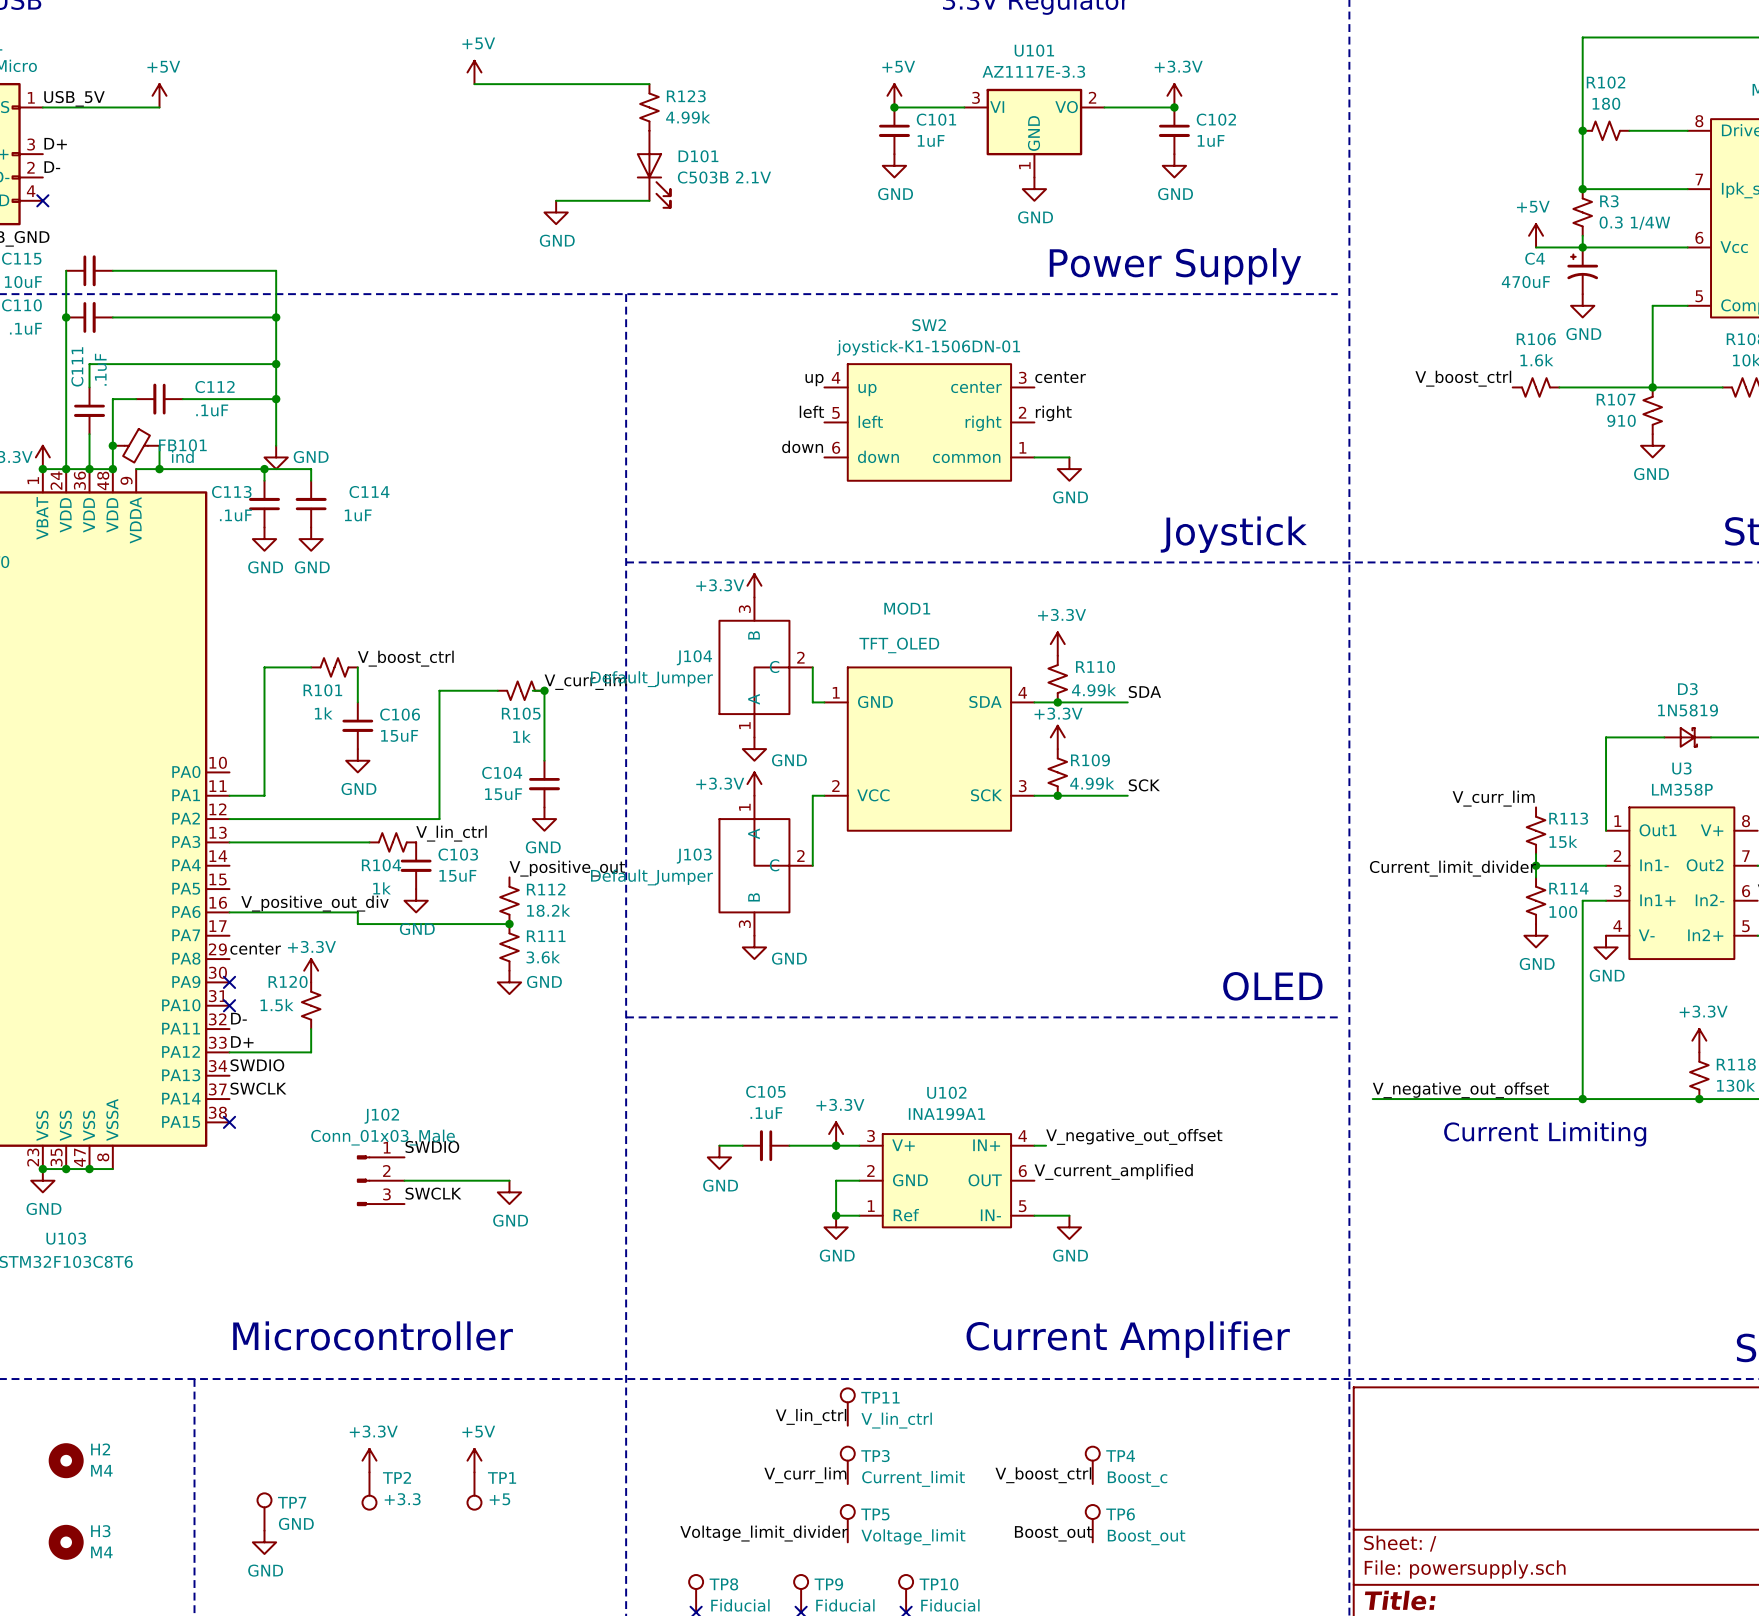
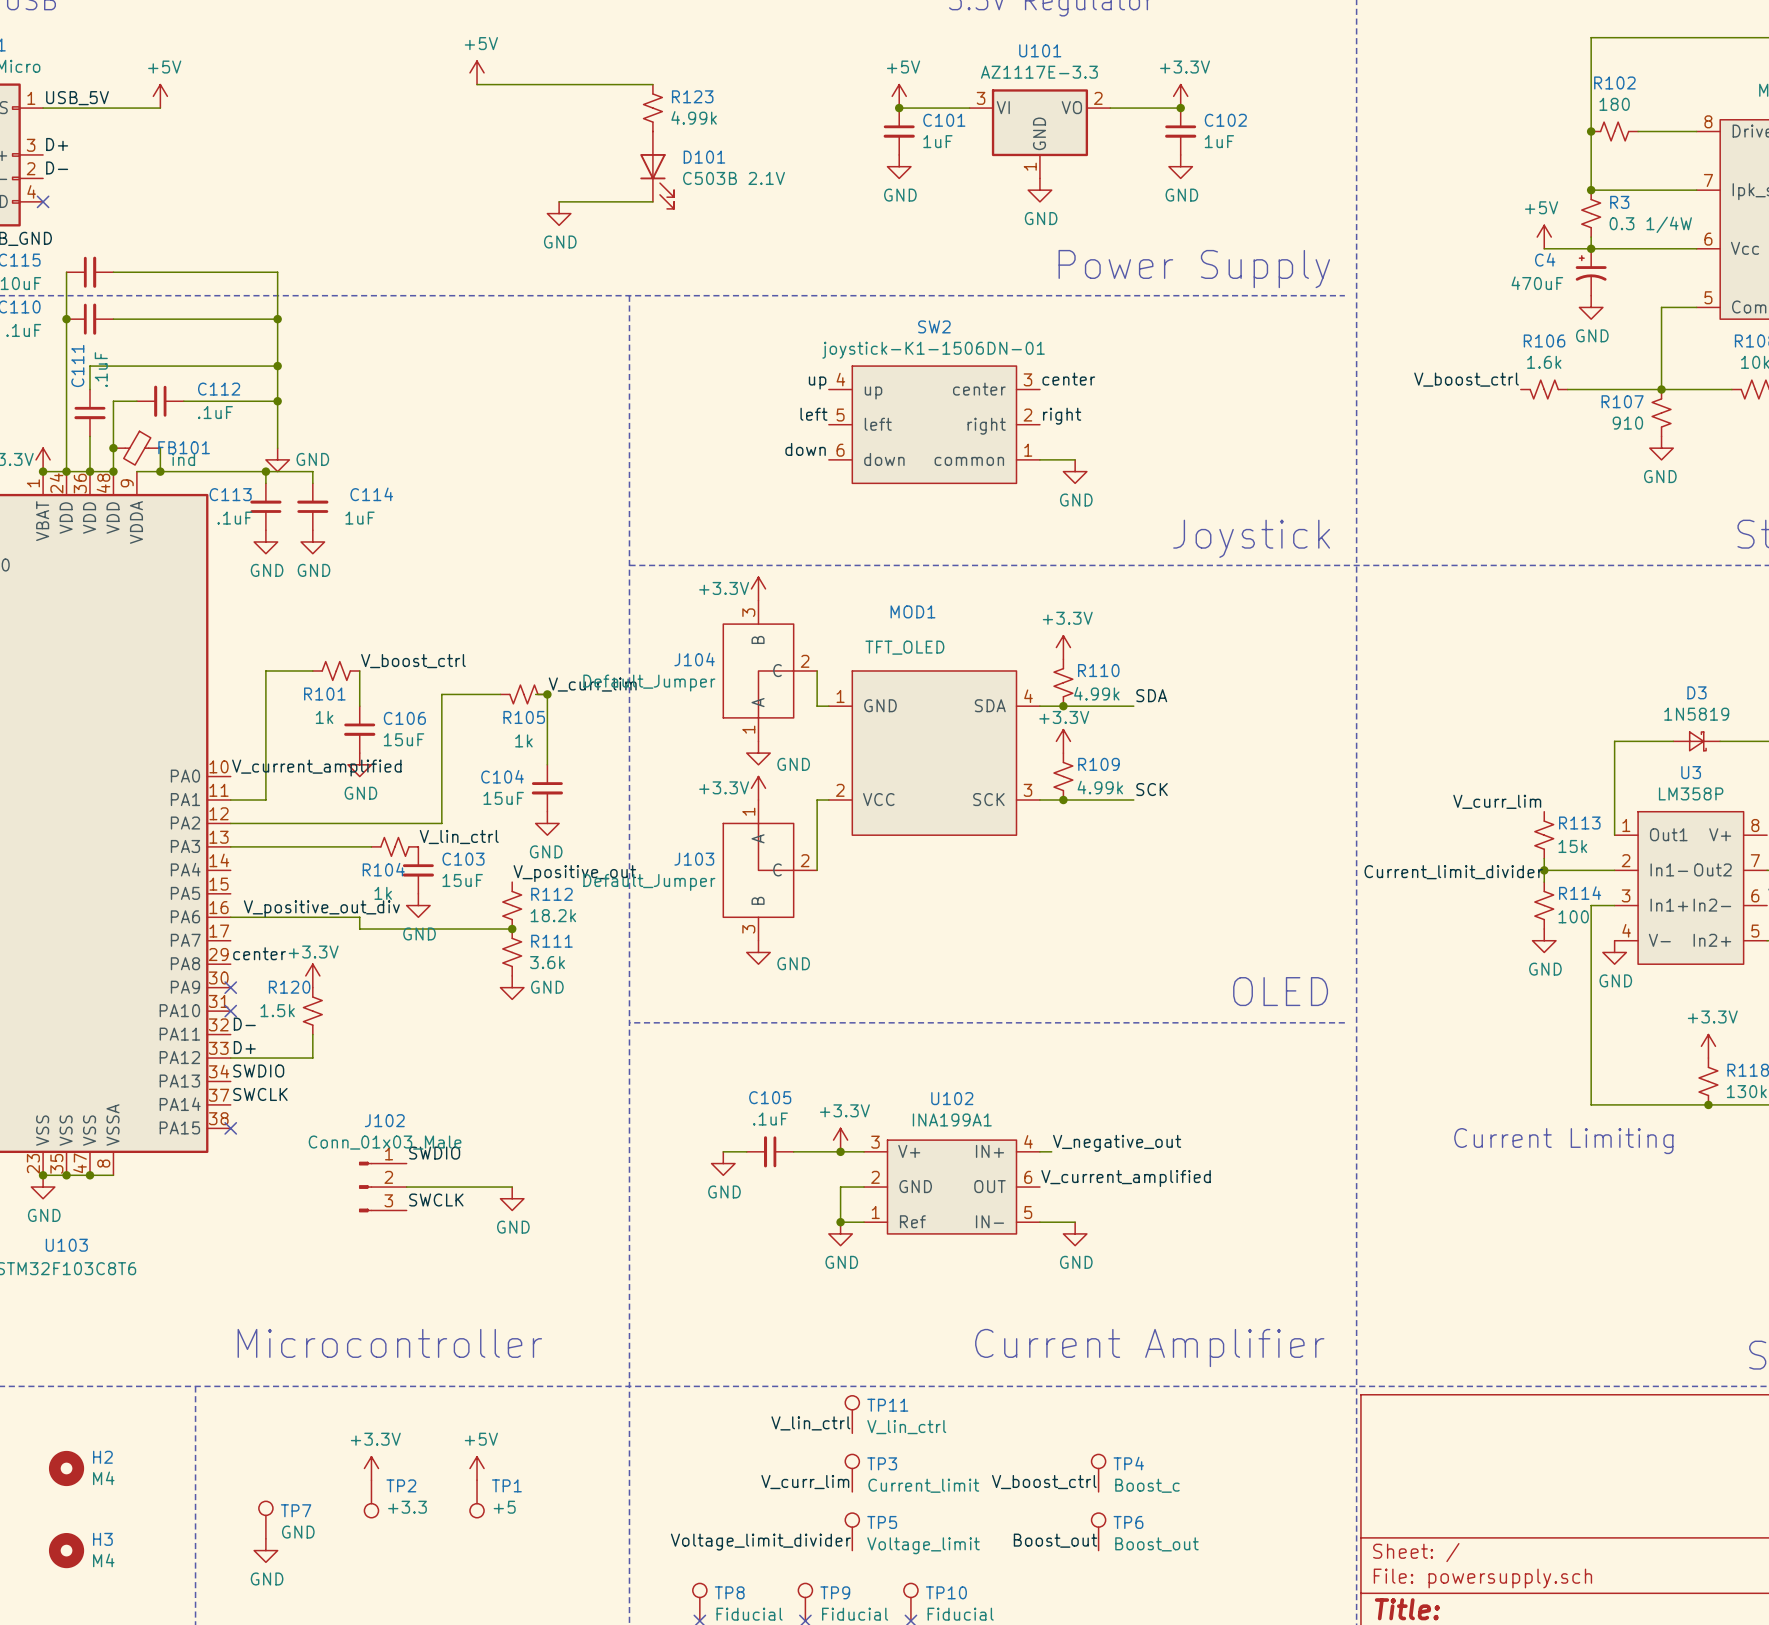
label: none -> V_current_amplified (316, 768)
label: V_negative_out_offset (1460, 1090) -> none
wire: (1372, 1099) (1582, 1099) -> none
junction: (1582, 1099) -> none
label: V_negative_out_offset (1134, 1136) -> V_negative_out (1117, 1143)

